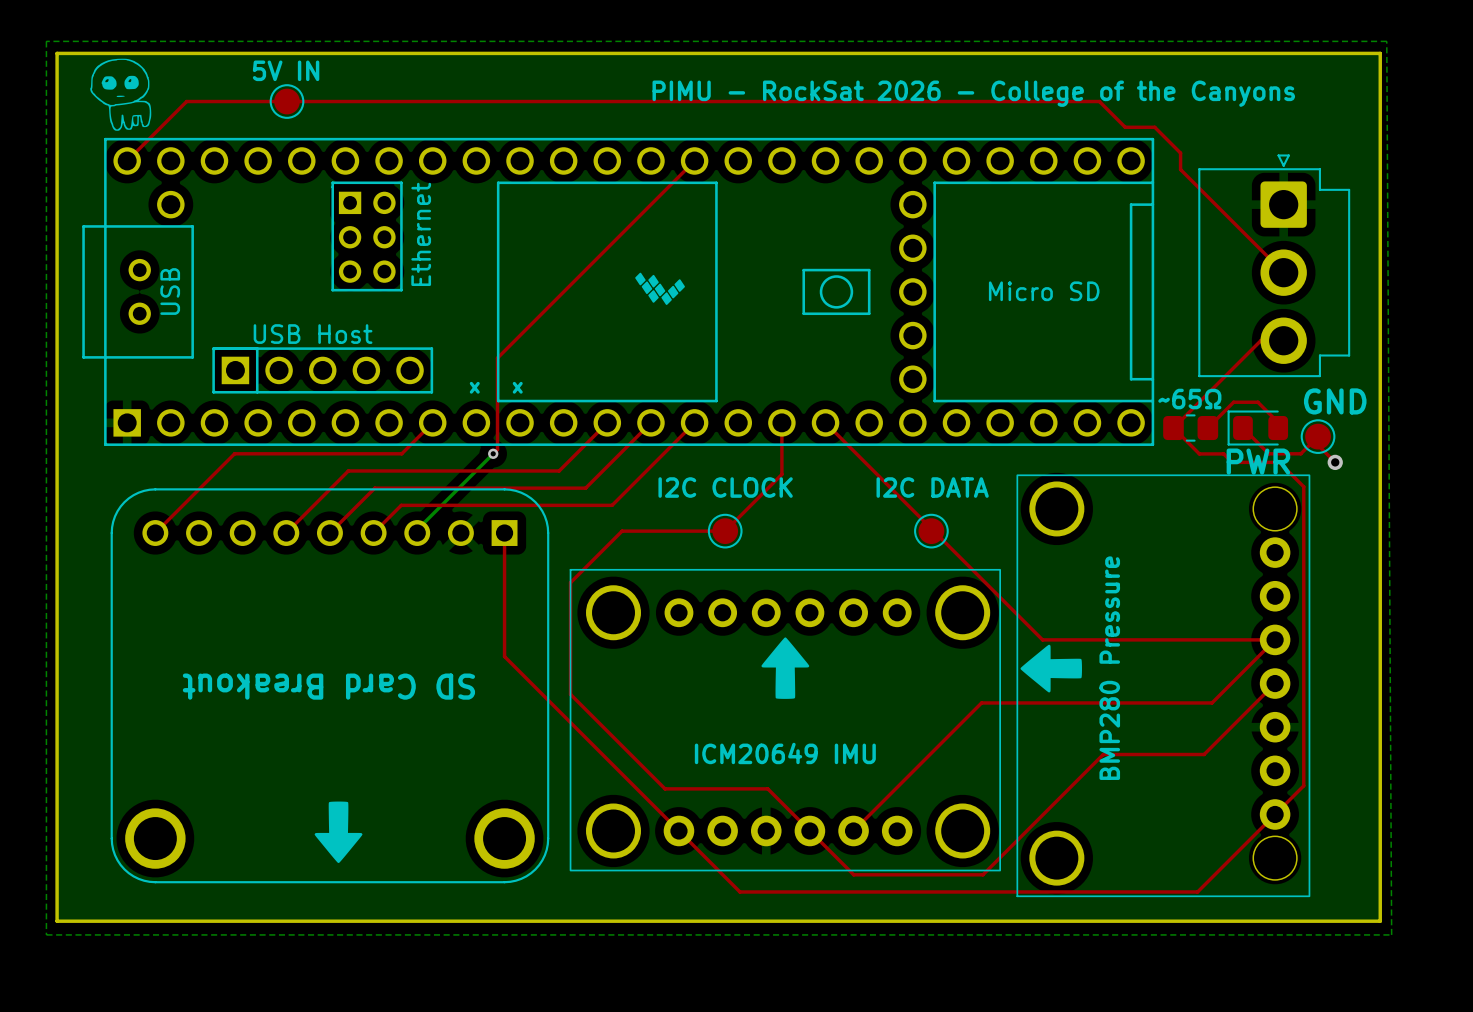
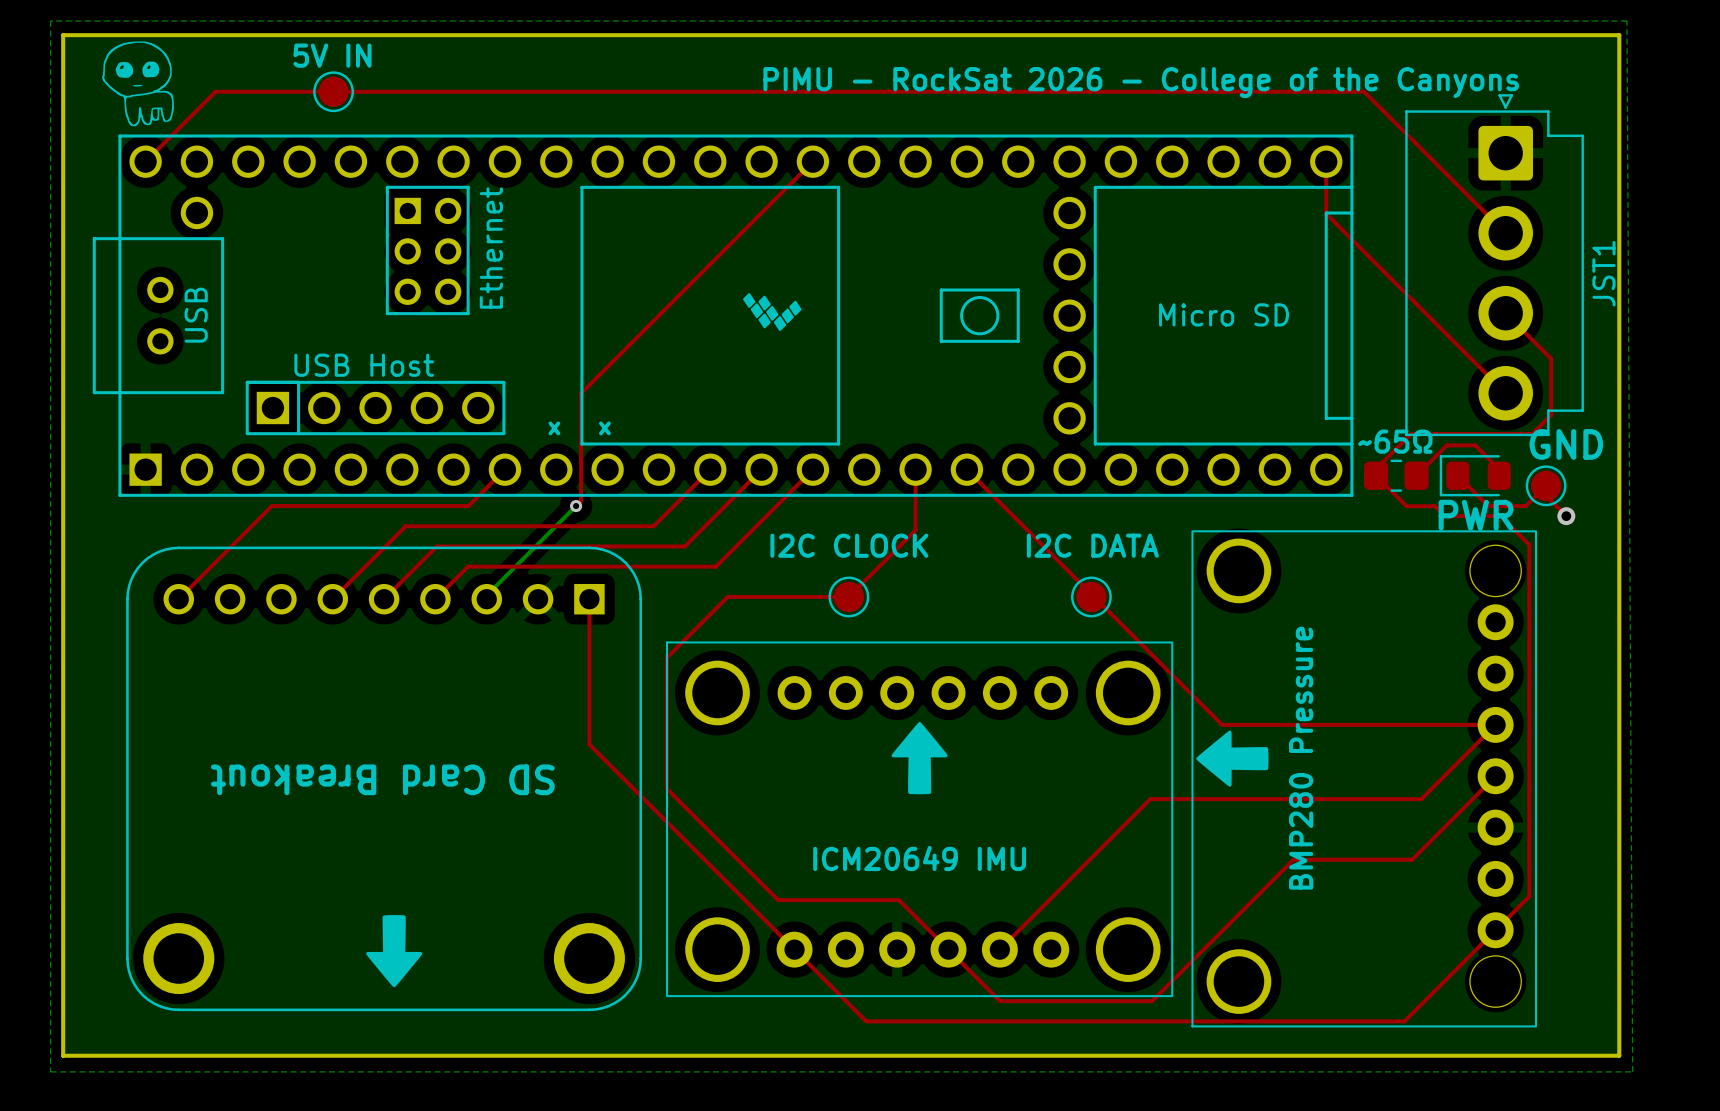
top track: (1099, 101) (1125, 127) (1154, 127) (1180, 153) (1180, 169) (1283, 272) -> (1289, 91) (1364, 91) (1505, 233)
top track: none -> (1326, 161) (1326, 213) (1505, 393)
JST1: none -> (1494, 265)
part: (1274, 265) -> none
top track: (1283, 340) (1260, 340) (1173, 428) -> (1505, 313) (1551, 358) (1551, 415) (1532, 433) (1411, 433) (1376, 468) (1376, 475)

